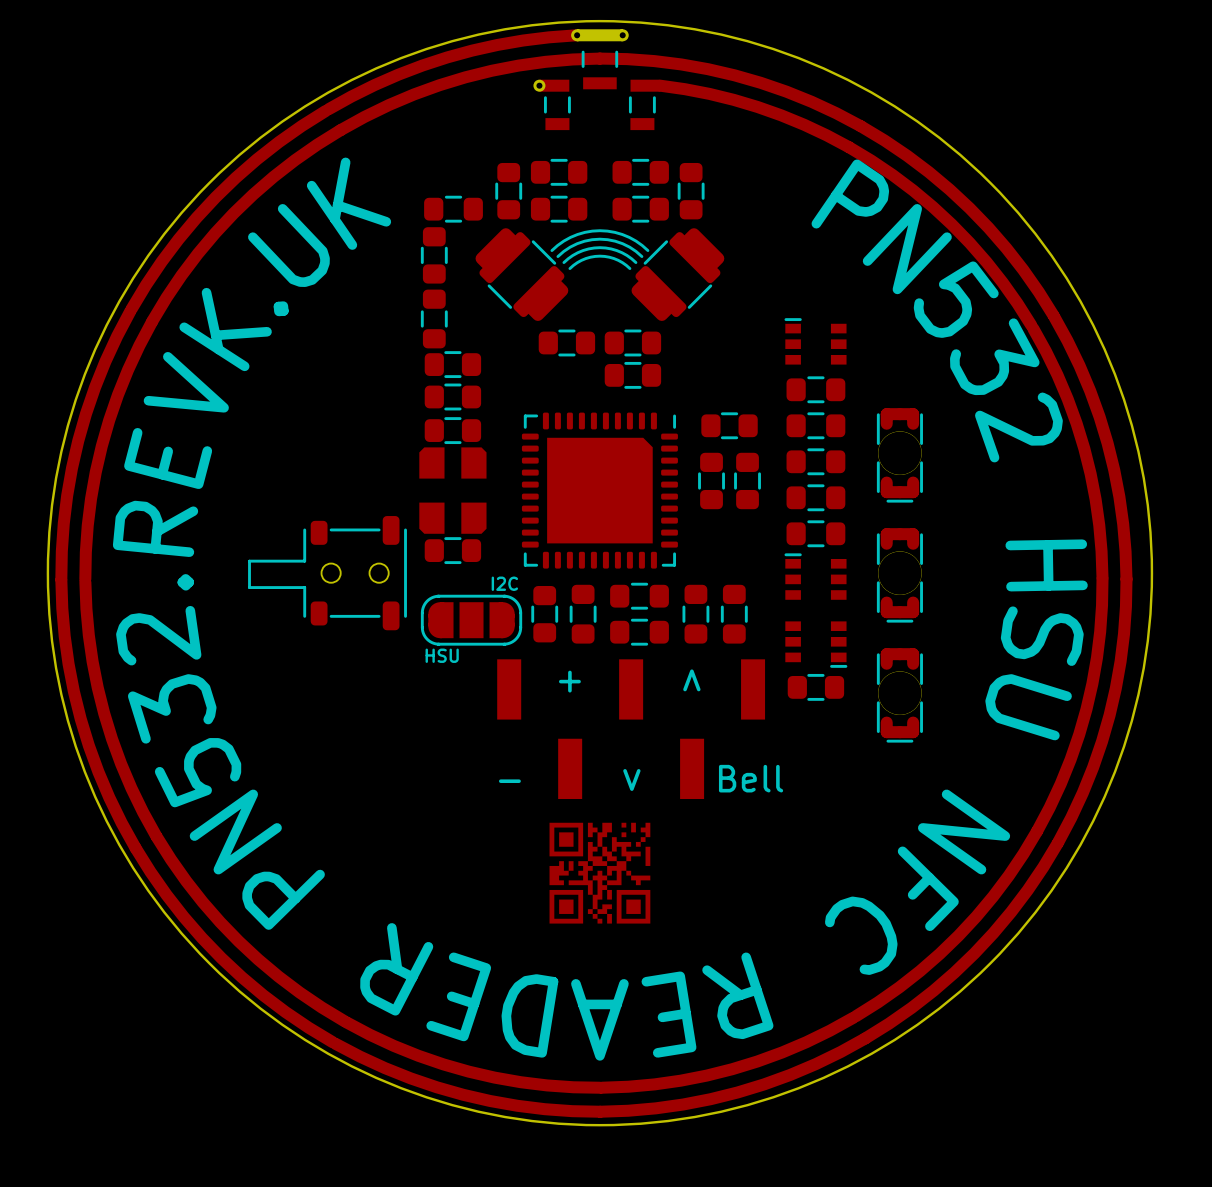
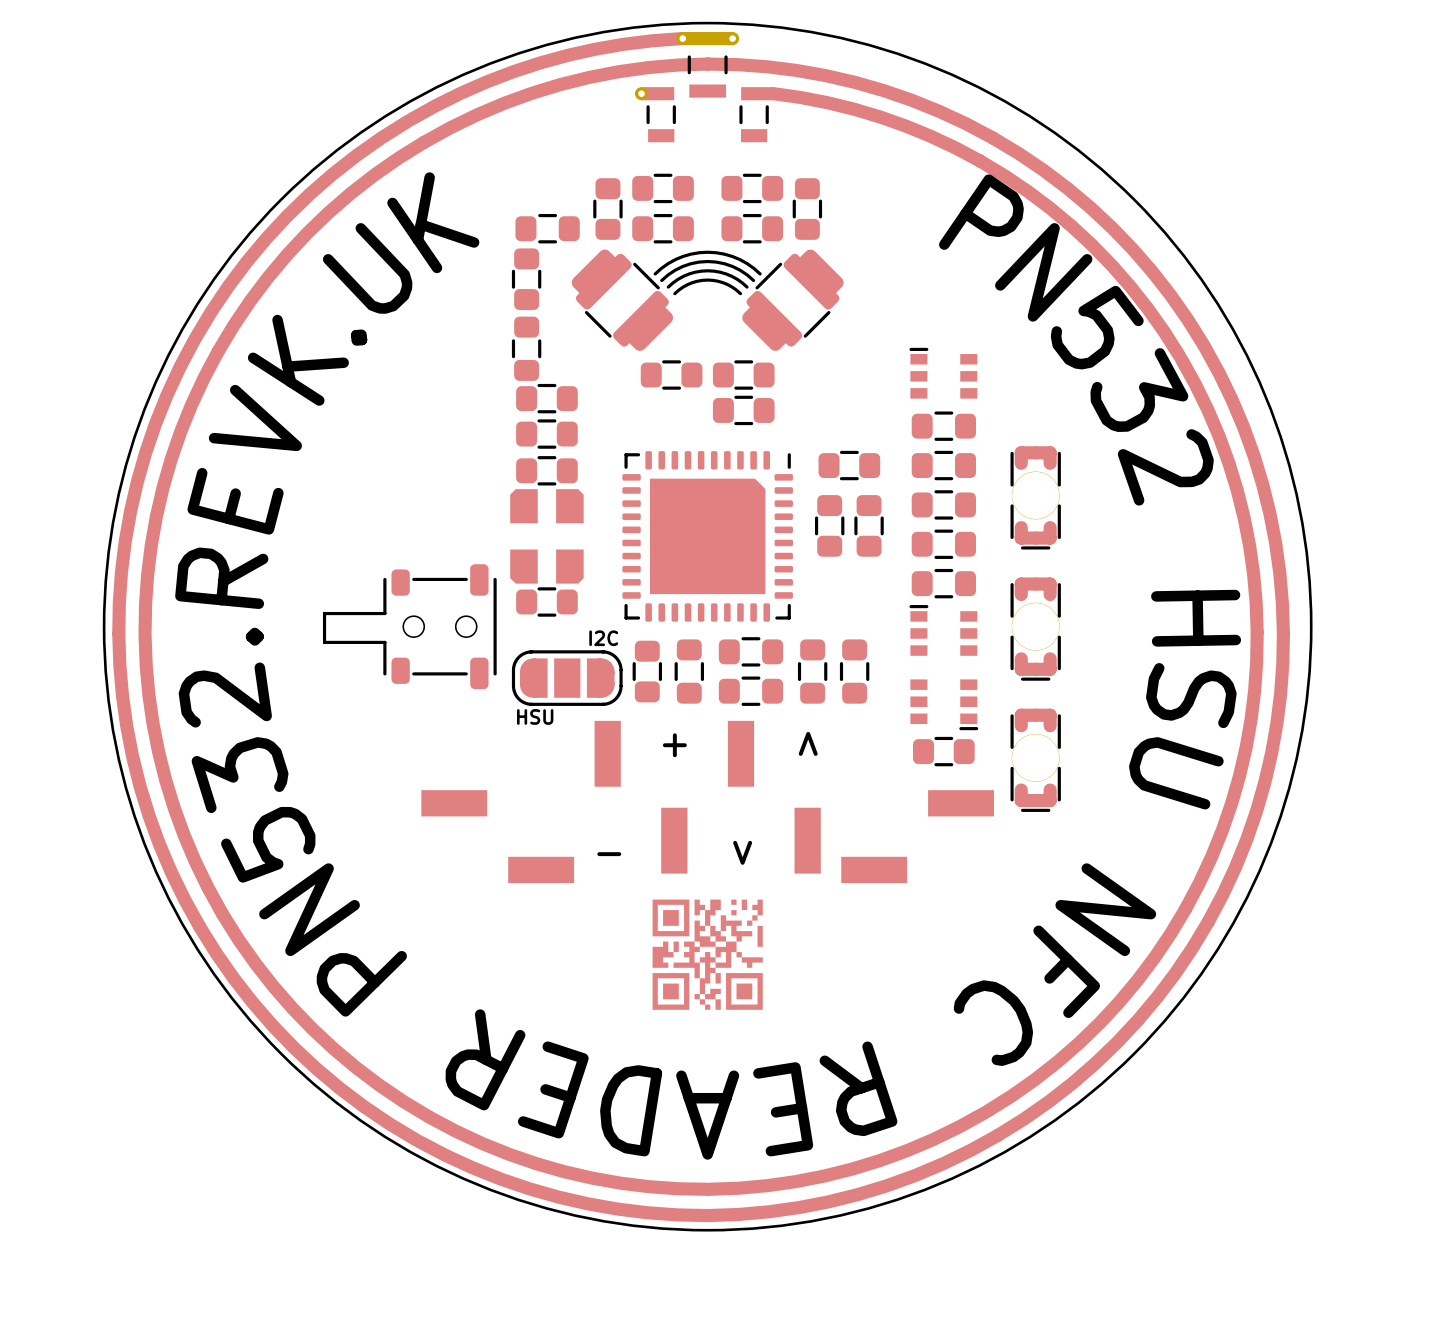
part: none -> (707, 797)
part: (631, 729) -> none
part: none -> (497, 836)
part: none -> (917, 836)
text: Bell (751, 778) -> none

